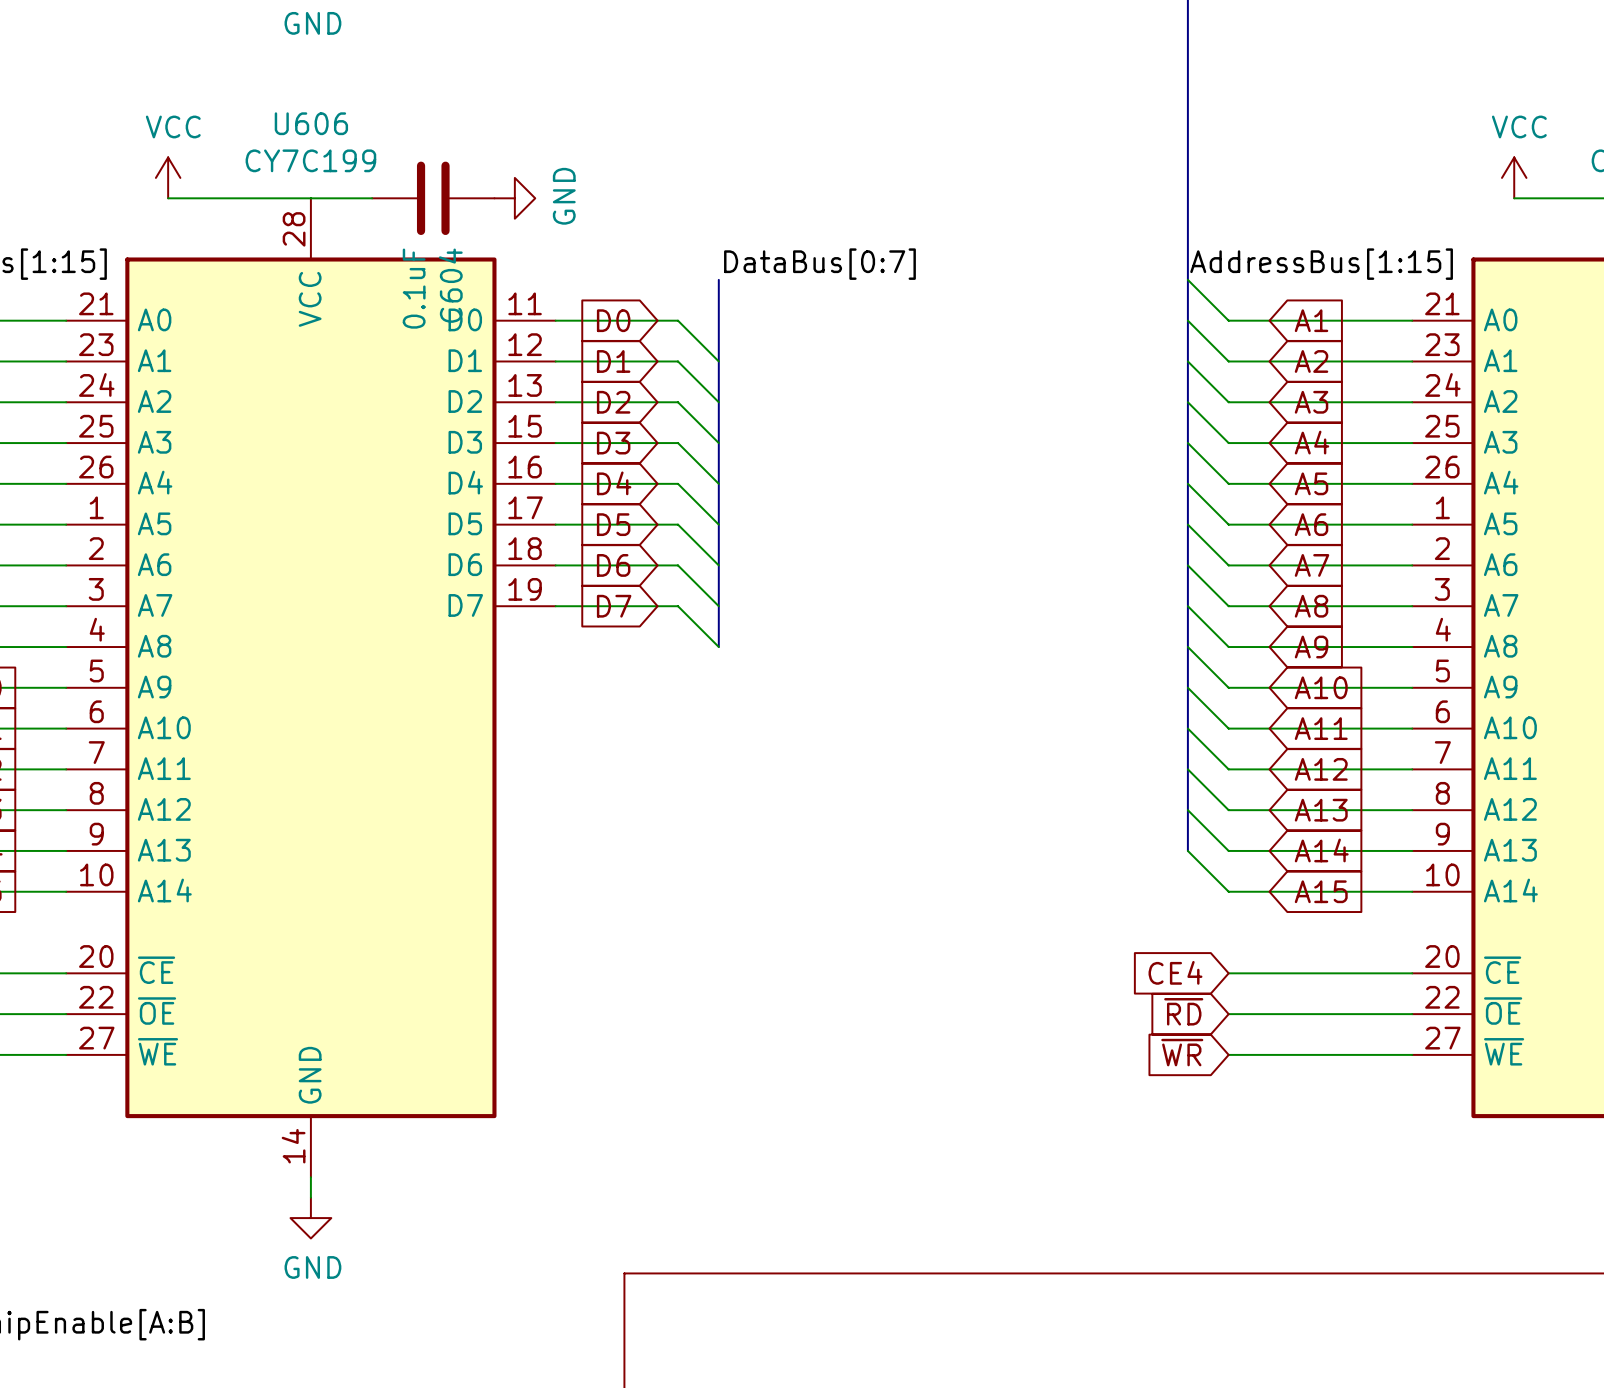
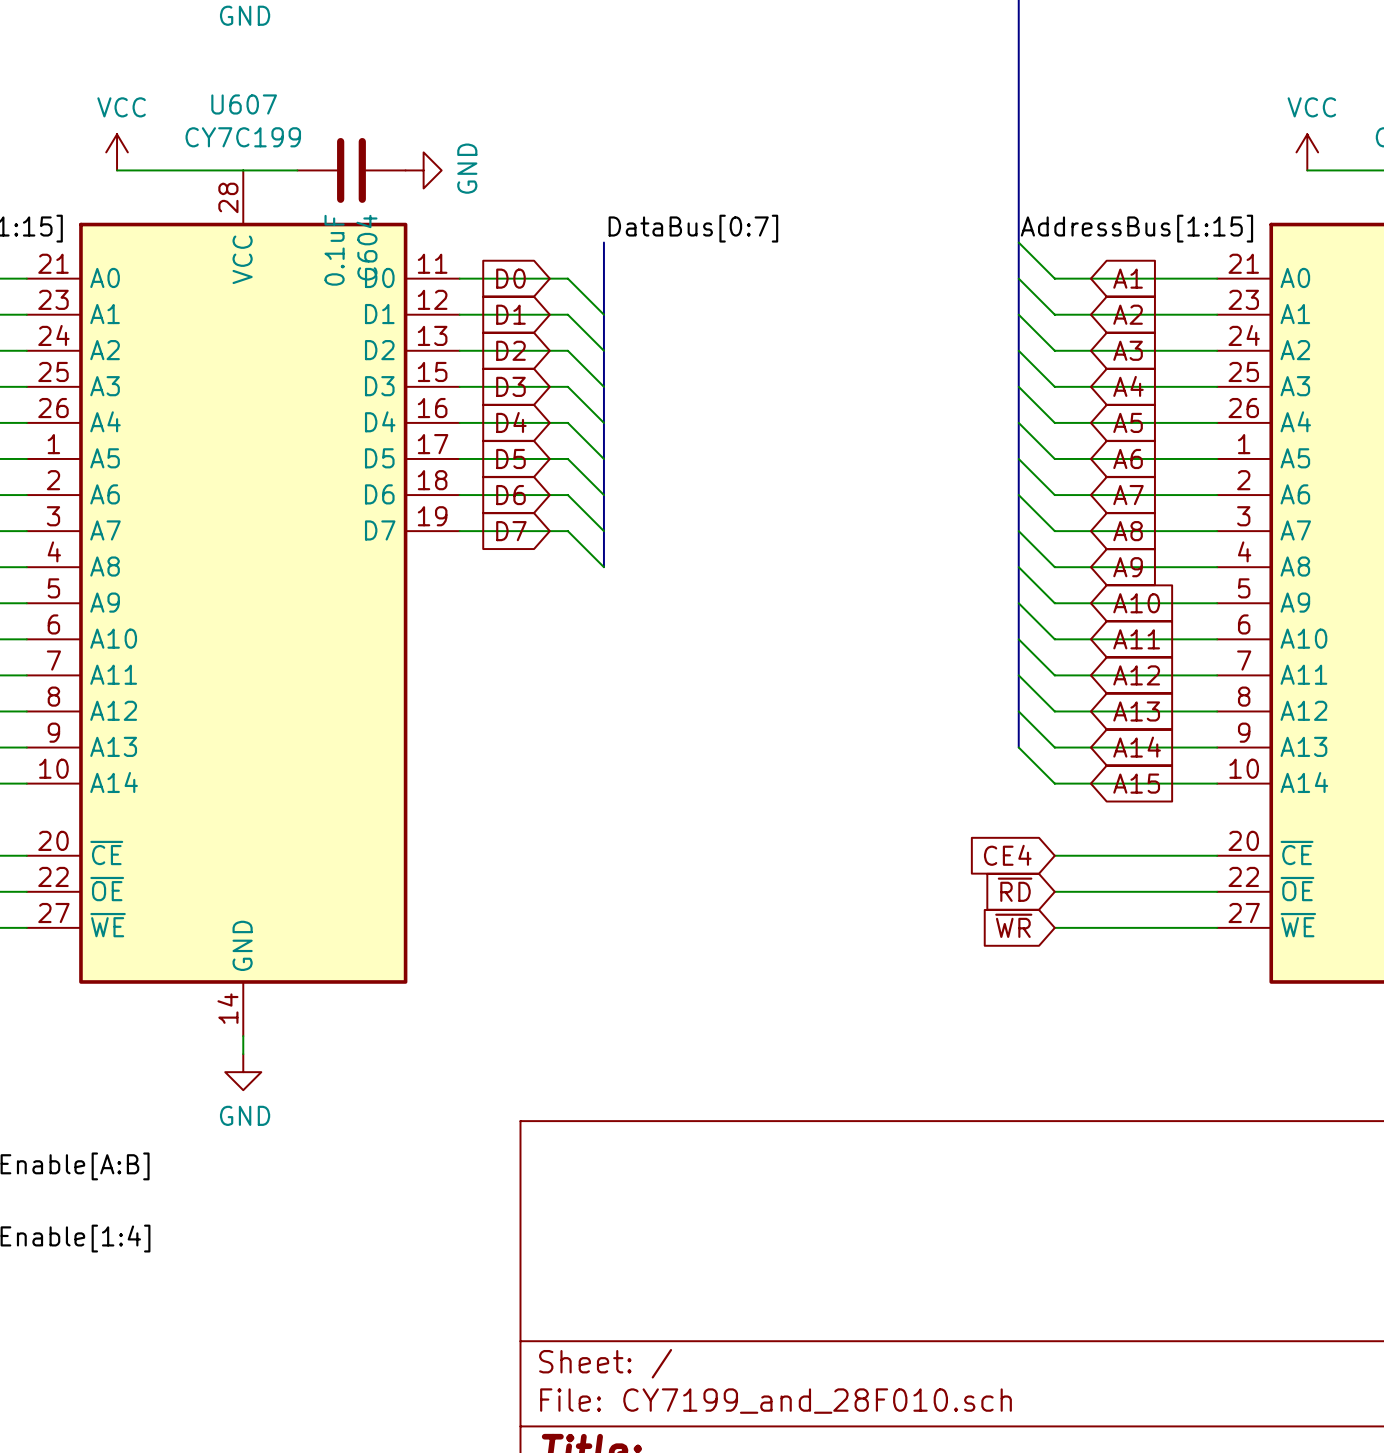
U606 name: U606 (311, 123) -> U607 (244, 104)

